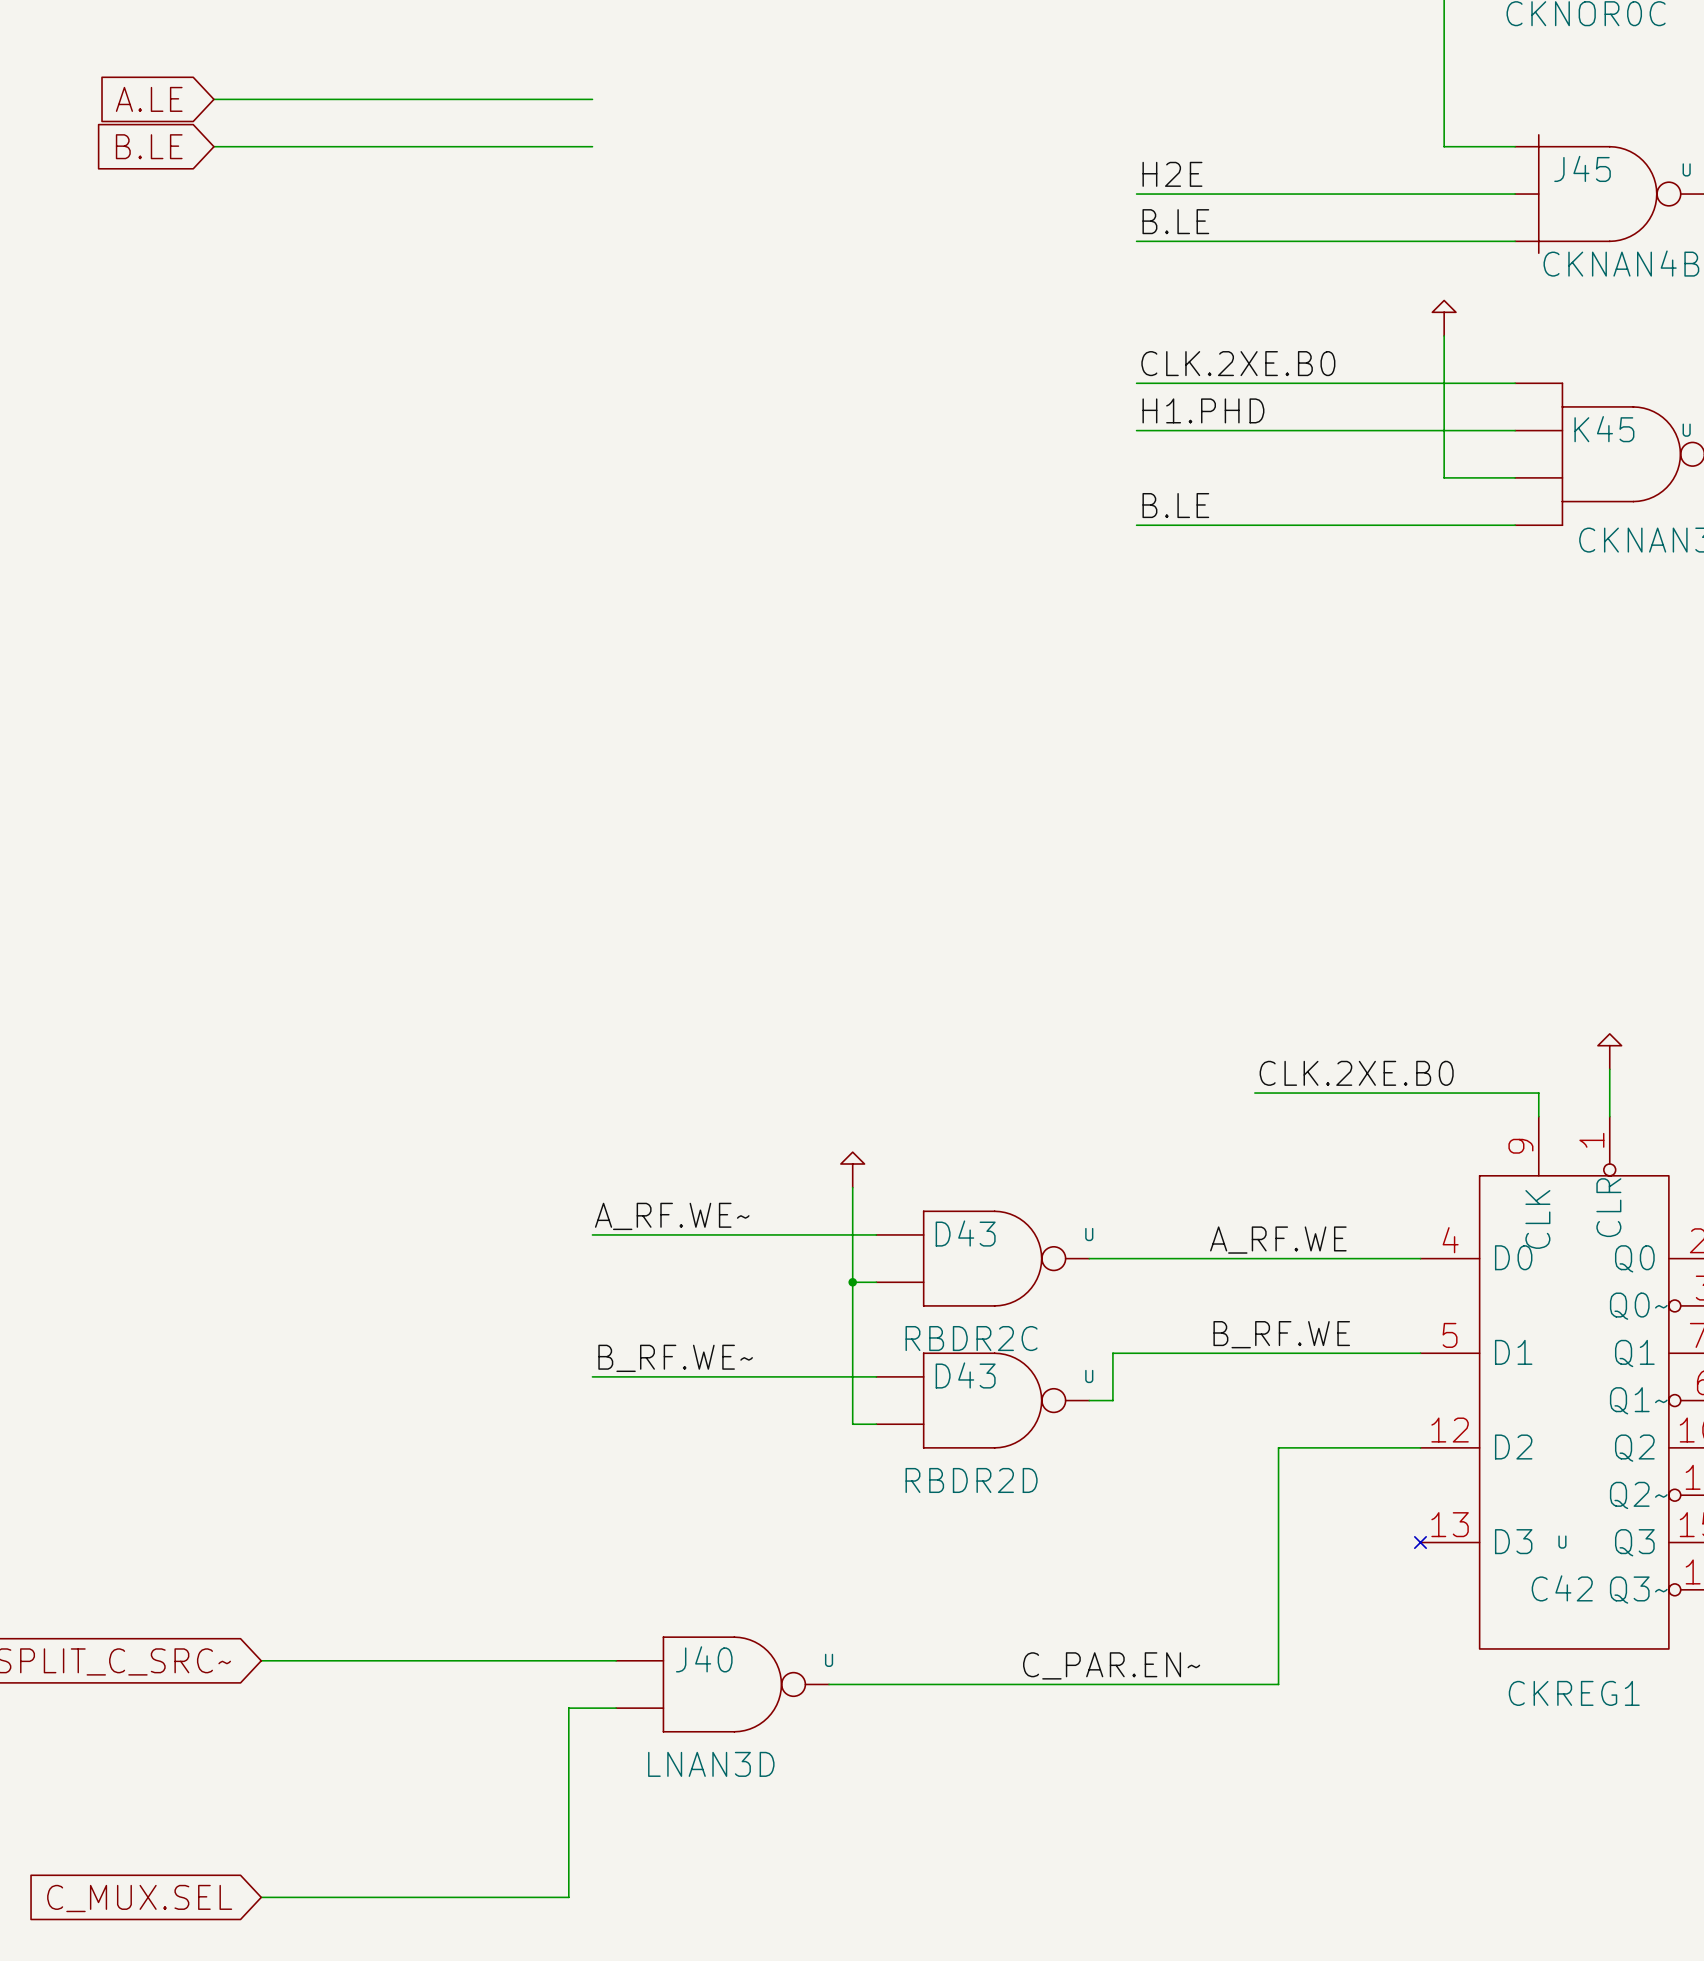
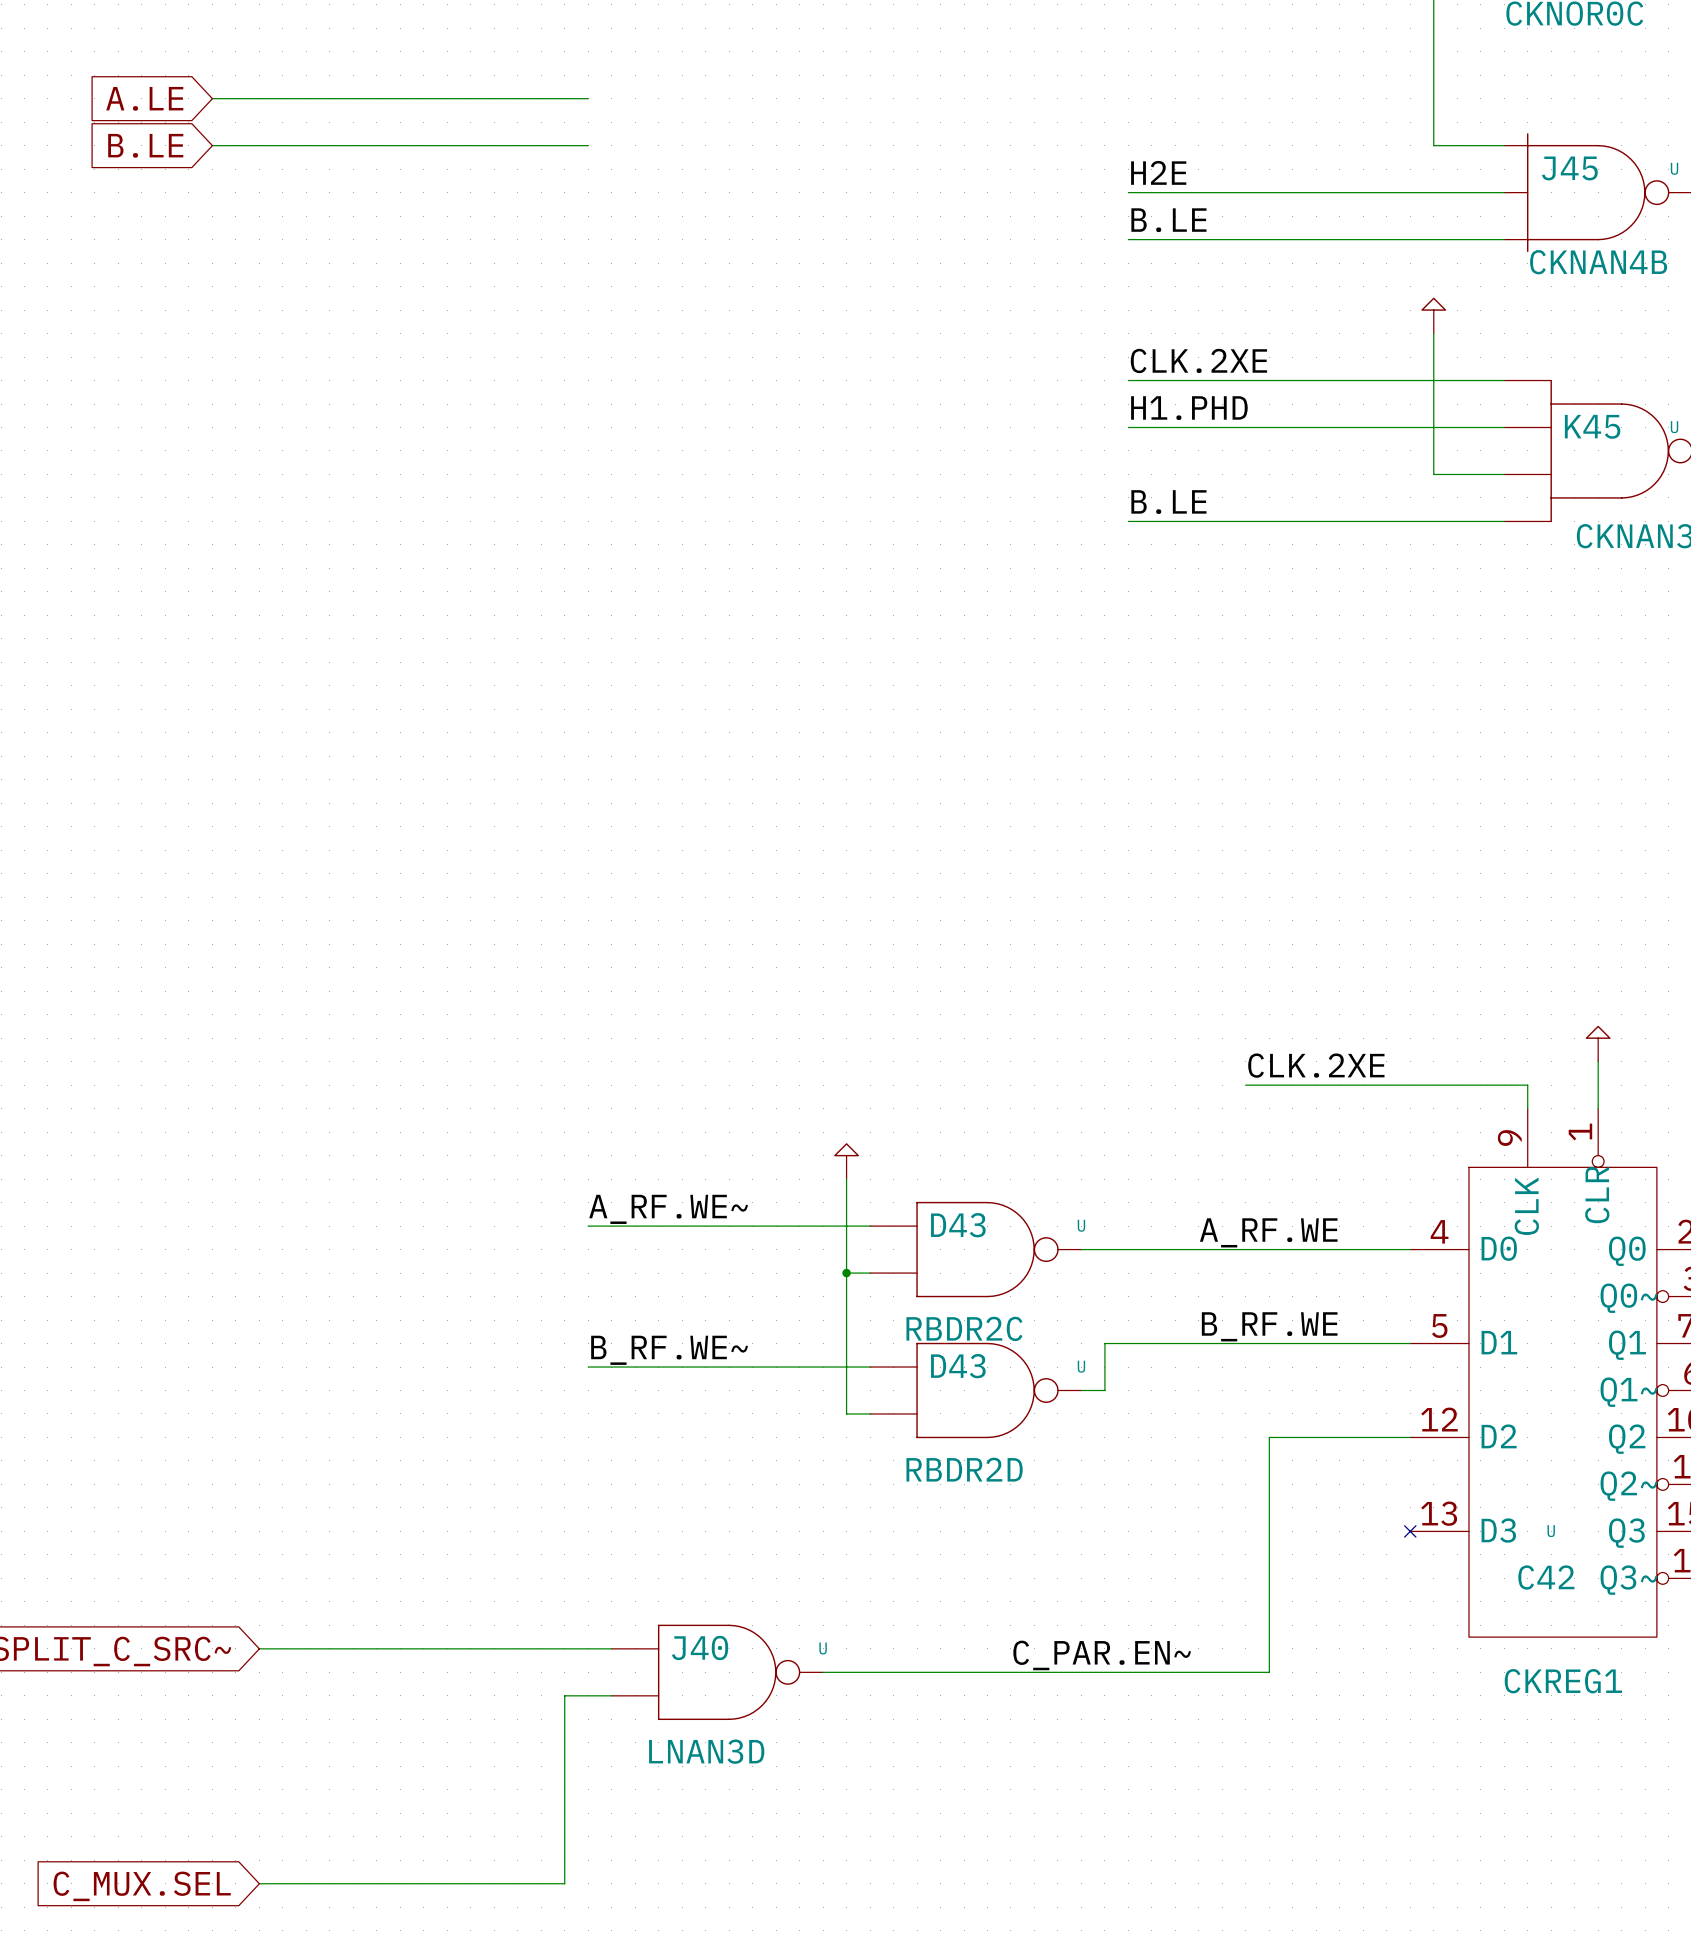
label: CLK.2XE.B0 (1238, 363) -> CLK.2XE (1198, 360)
label: CLK.2XE.B0 (1356, 1073) -> CLK.2XE (1316, 1065)

